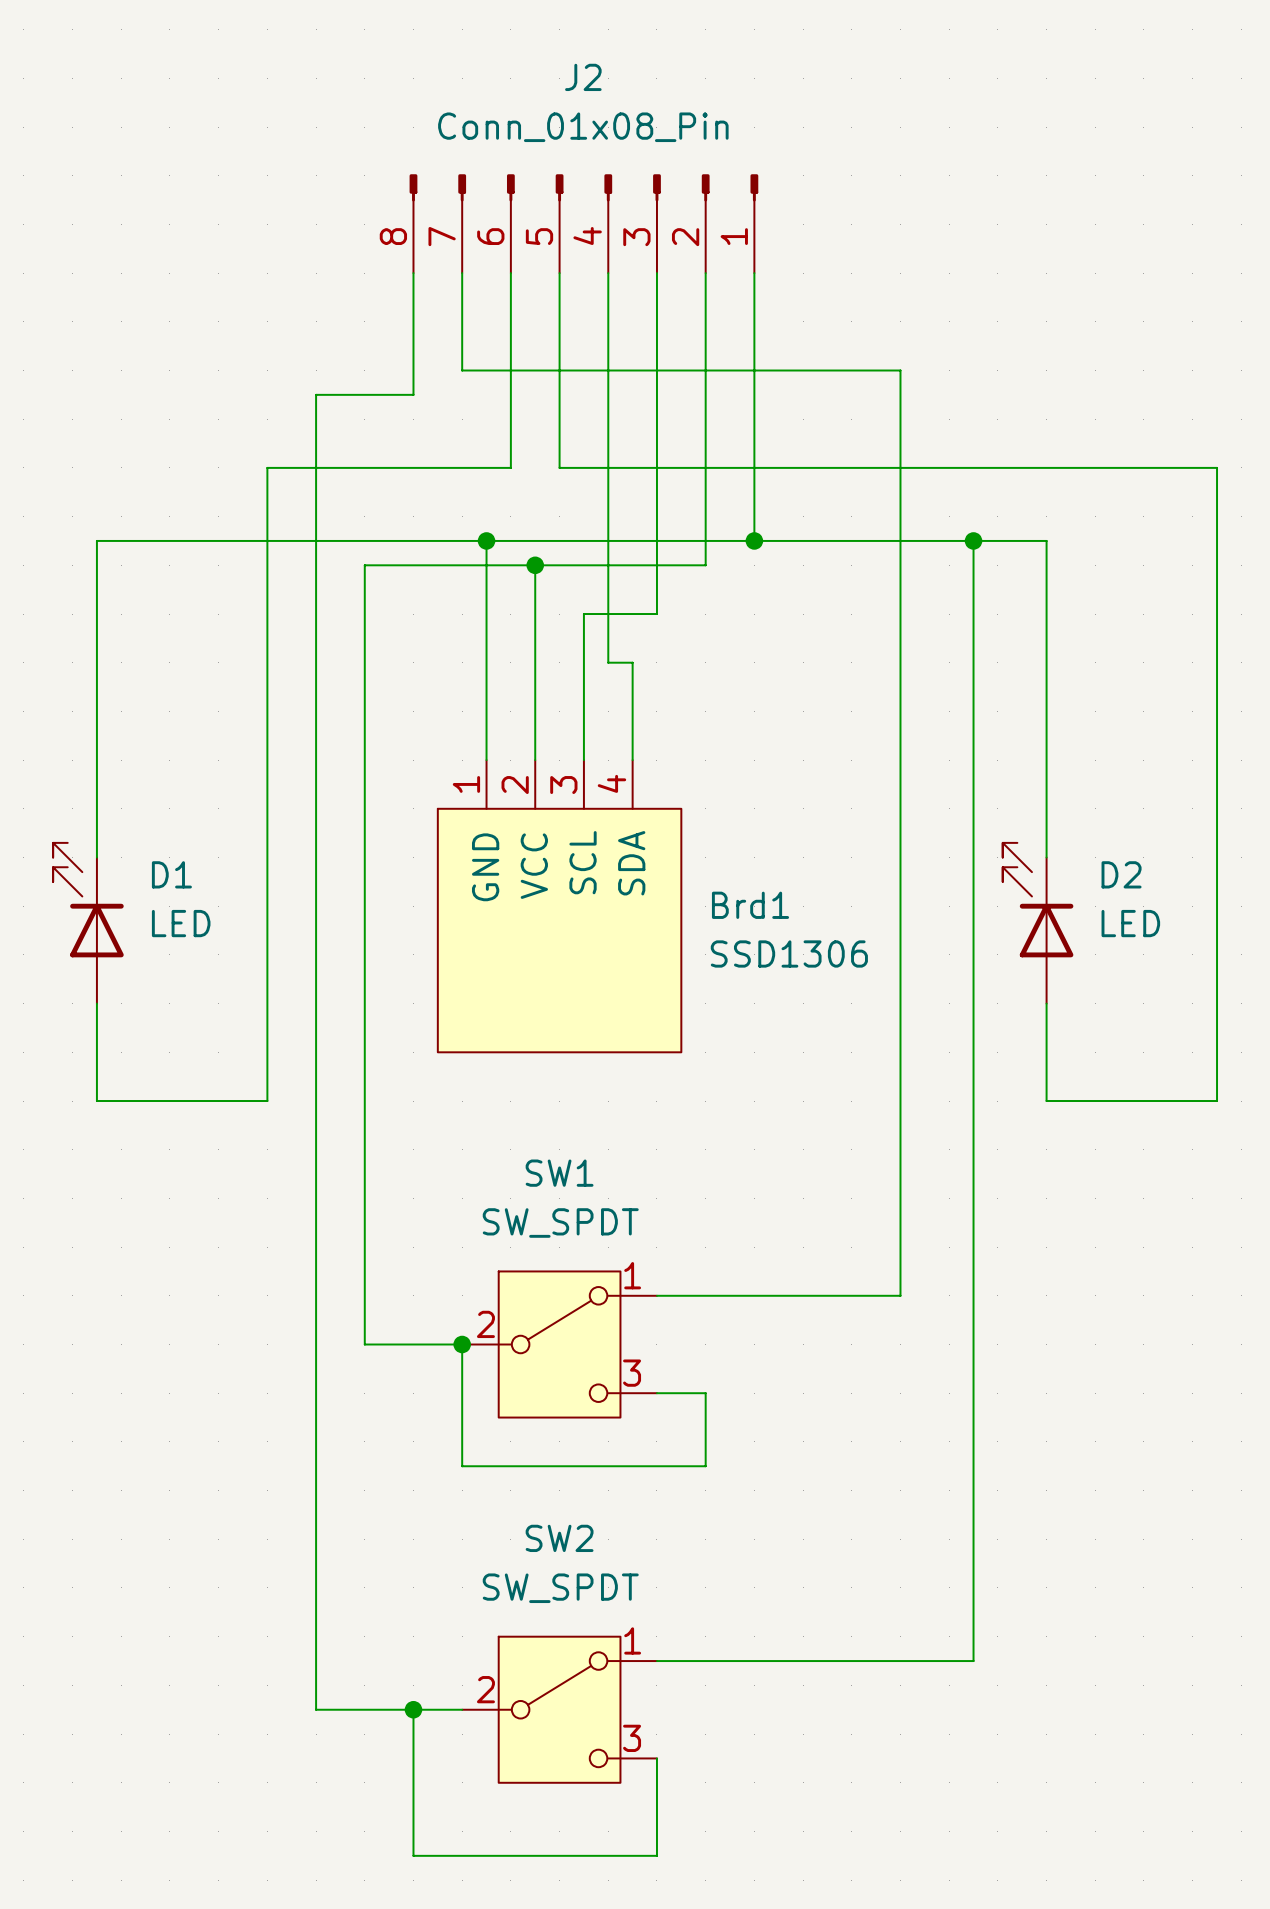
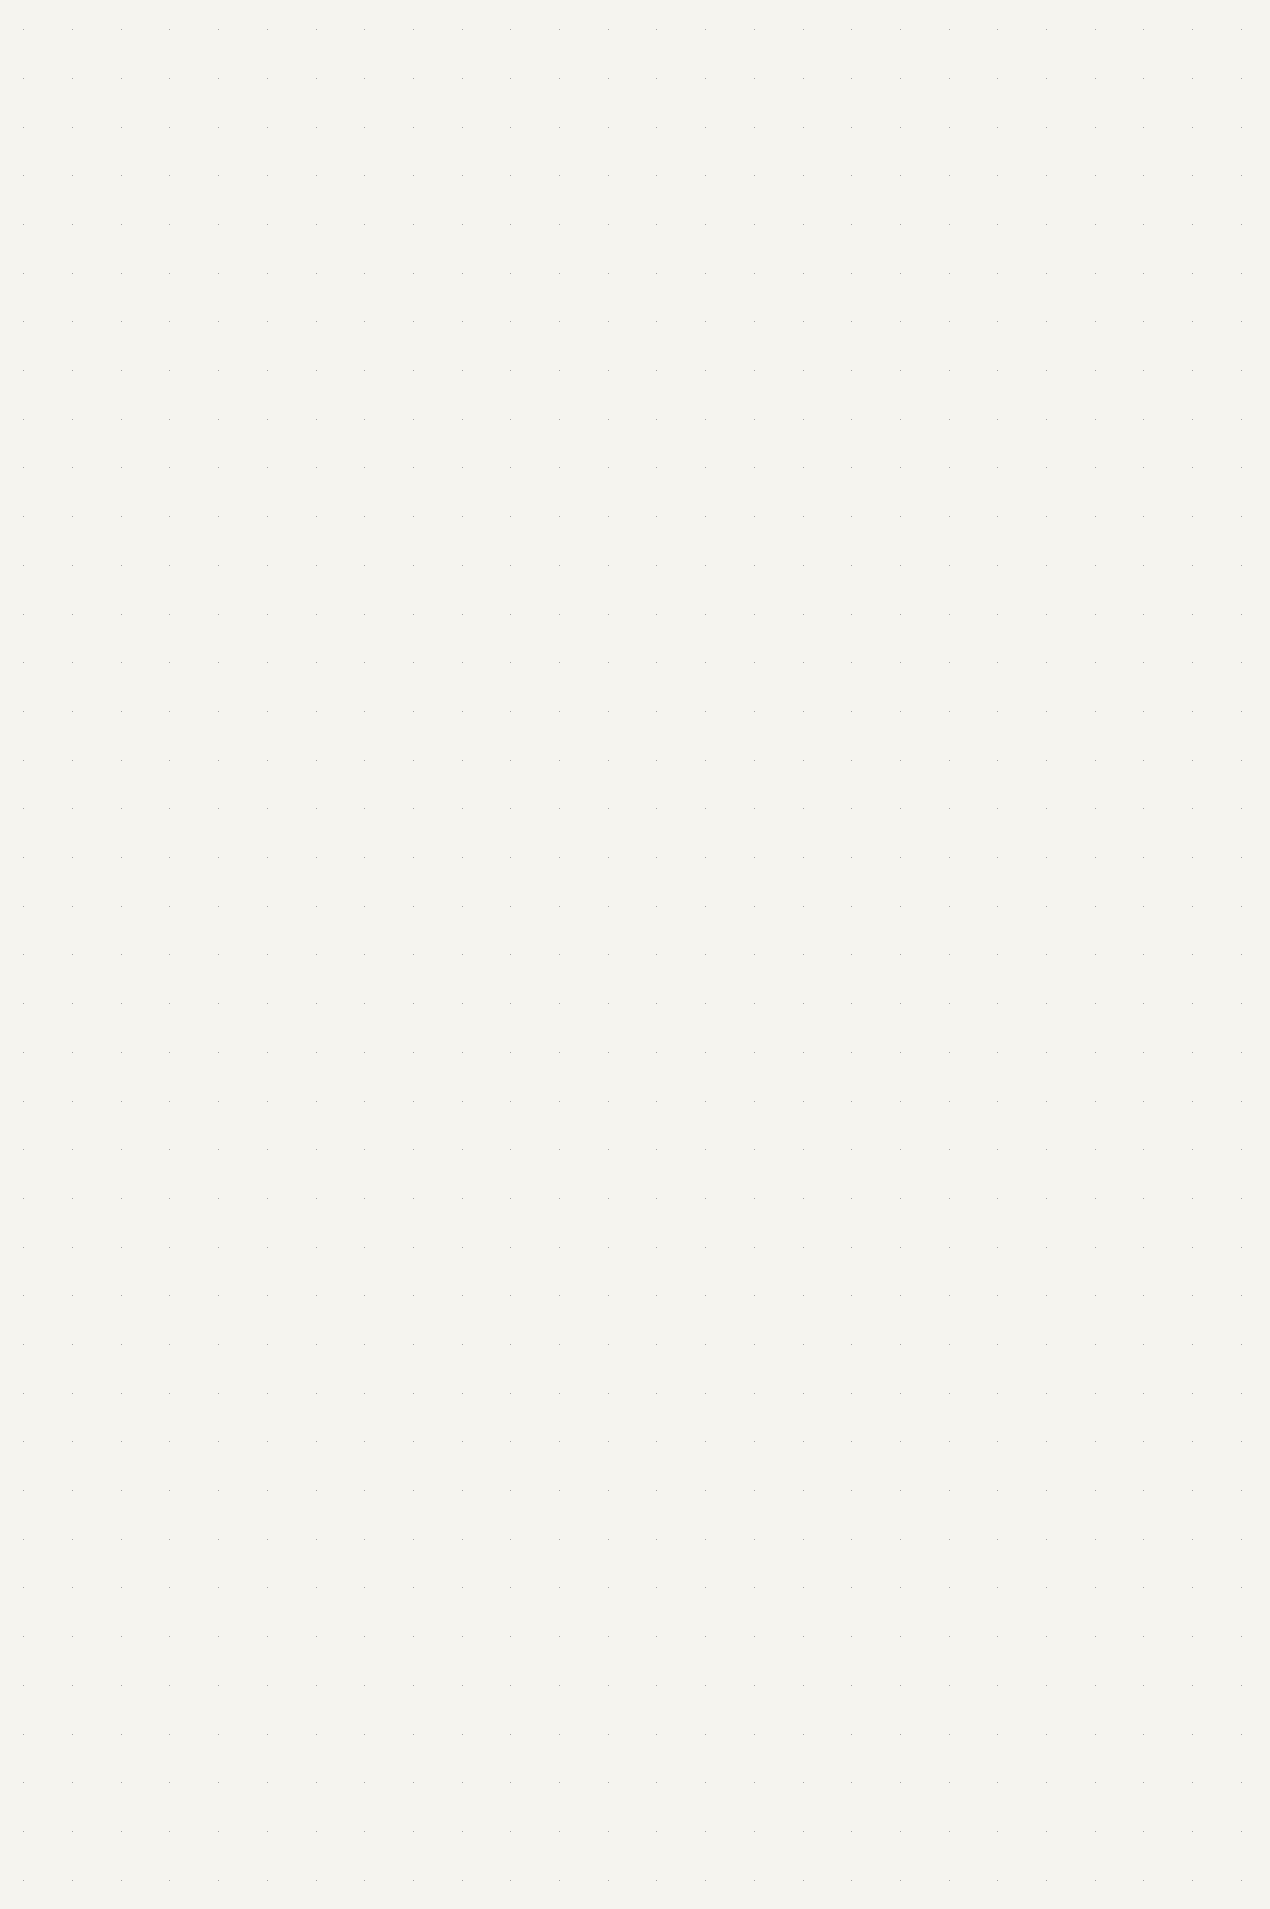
J2: Conn_01x08_Pin (583, 223) -> none
wire: (413, 273) (413, 394) (316, 394) (316, 1709) (462, 1709) -> none
wire: (462, 273) (462, 370) (900, 370) (900, 1295) (656, 1295) -> none
wire: (510, 273) (510, 467) (267, 467) (267, 1101) (96, 1101) (96, 1003) -> none
wire: (559, 273) (559, 467) (1217, 467) (1217, 1101) (1046, 1101) (1046, 1003) -> none
wire: (608, 273) (608, 662) (632, 662) (632, 760) -> none
wire: (656, 273) (656, 614) (583, 614) (583, 760) -> none
wire: (705, 273) (705, 565) (364, 565) (364, 1344) (462, 1344) (462, 1466) (705, 1466) (705, 1393) (656, 1393) -> none
wire: (754, 273) (754, 540) -> none
wire: (486, 540) (486, 760) -> none
junction: (486, 540) -> none
junction: (754, 540) -> none
wire: (973, 540) (973, 1661) (656, 1661) -> none
junction: (973, 540) -> none
wire: (535, 565) (535, 760) -> none
junction: (535, 565) -> none
wire: (96, 857) (96, 540) (1046, 540) (1046, 857) -> none
Brd1: SSD1306 (559, 906) -> none
D1: LED (88, 923) -> none
D2: LED (1038, 923) -> none
junction: (462, 1344) -> none
SW1: SW_SPDT (559, 1344) -> none
wire: (413, 1709) (413, 1855) (656, 1855) (656, 1758) -> none
junction: (413, 1709) -> none
SW2: SW_SPDT (559, 1709) -> none

